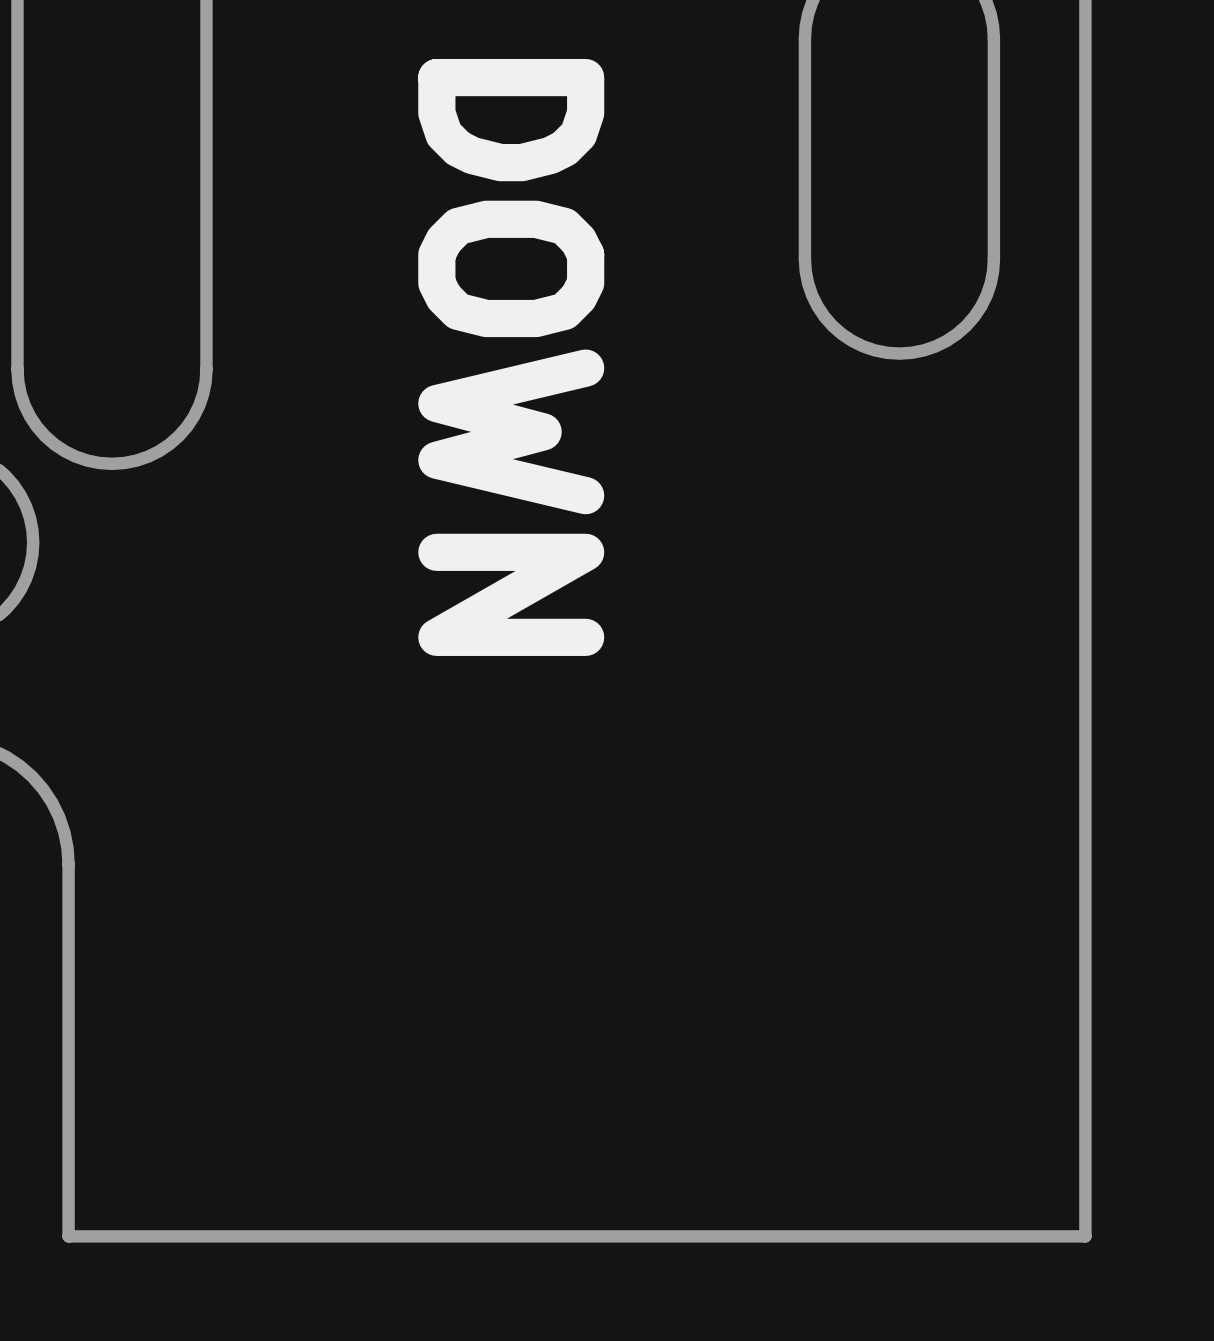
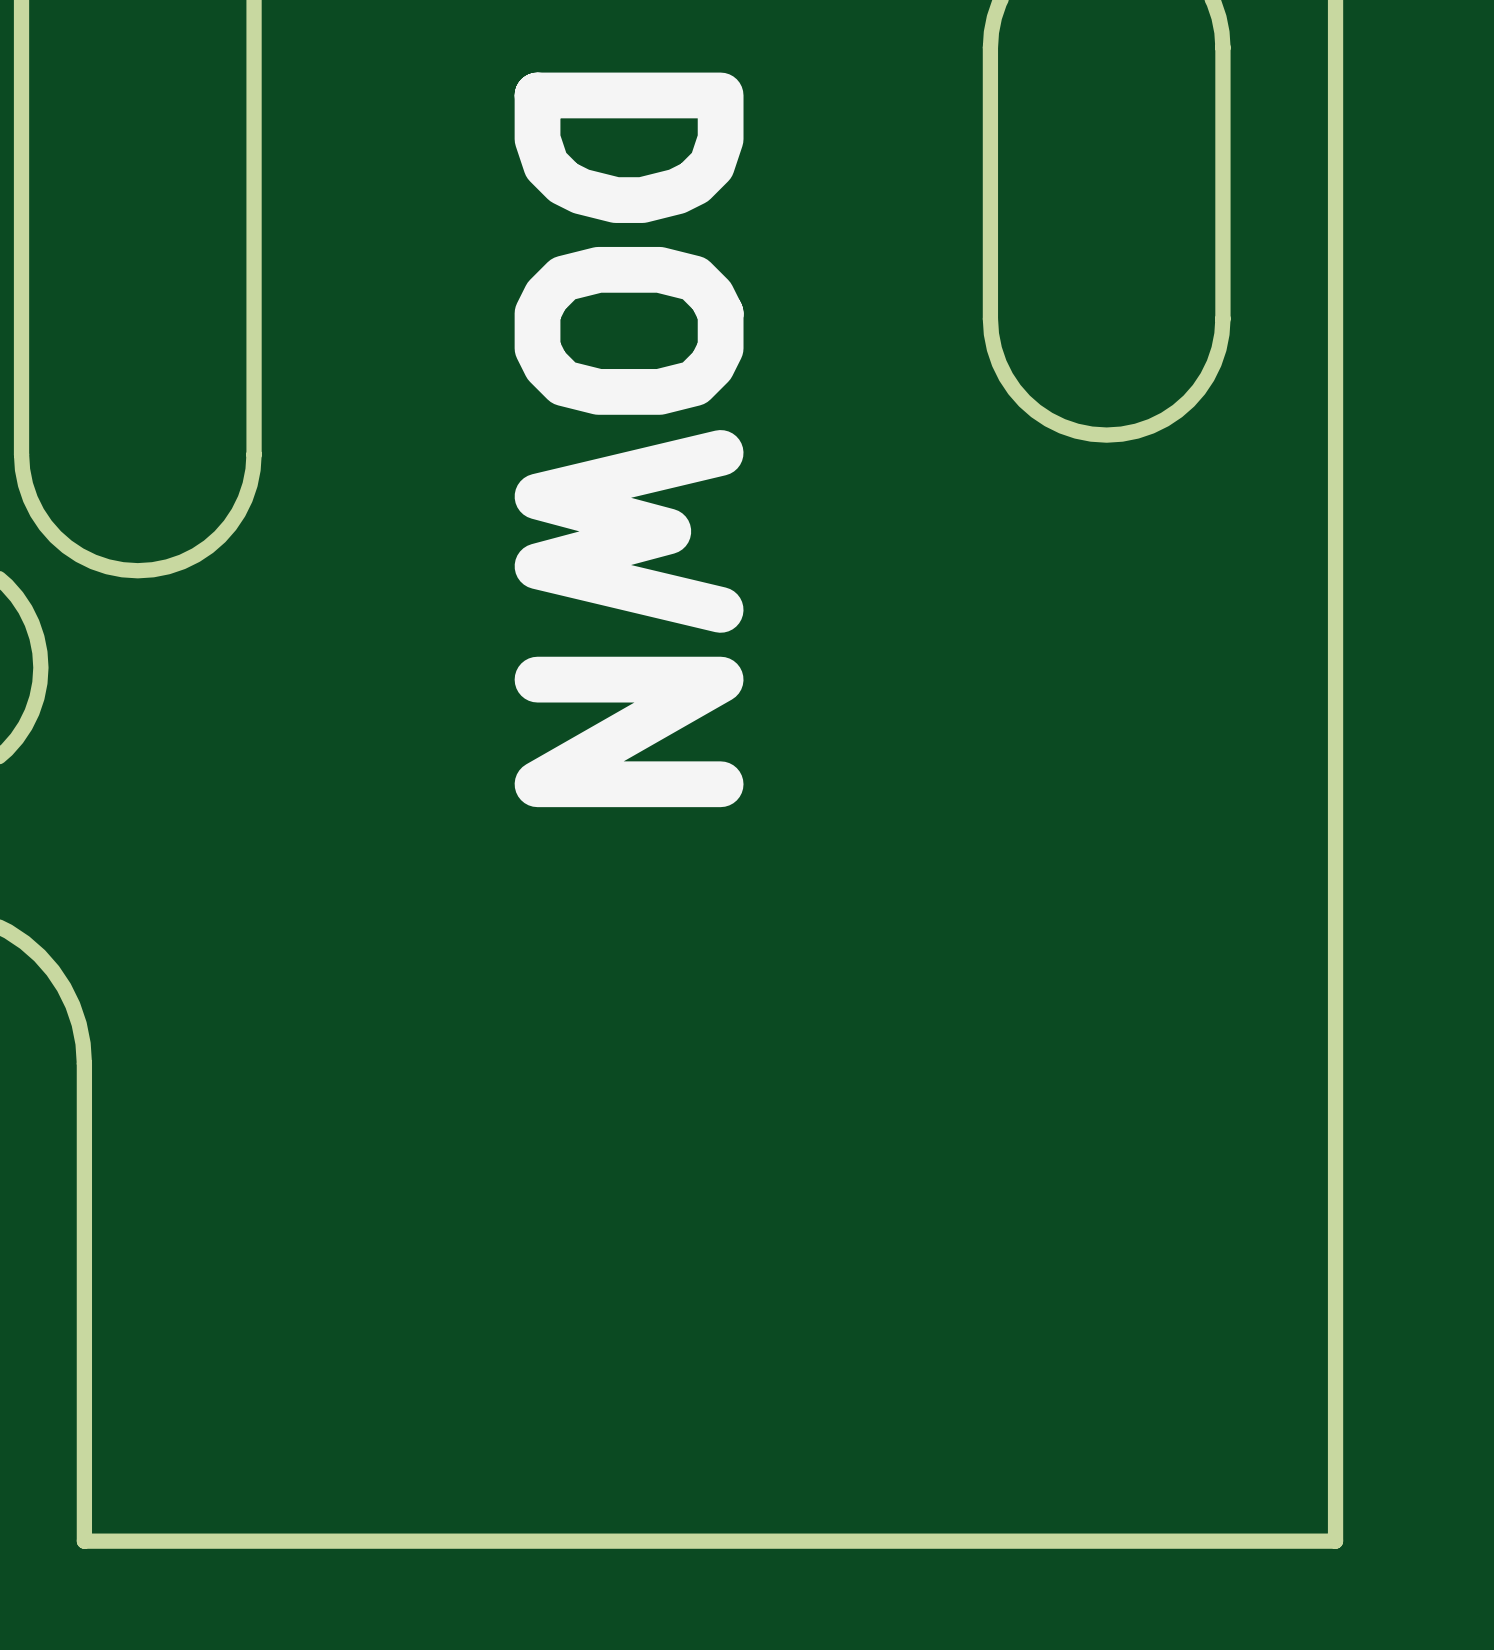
board edge: (1085, 1236) (68, 1236) -> (1335, 1521) (1335, 1541) (84, 1541) (84, 1521)

